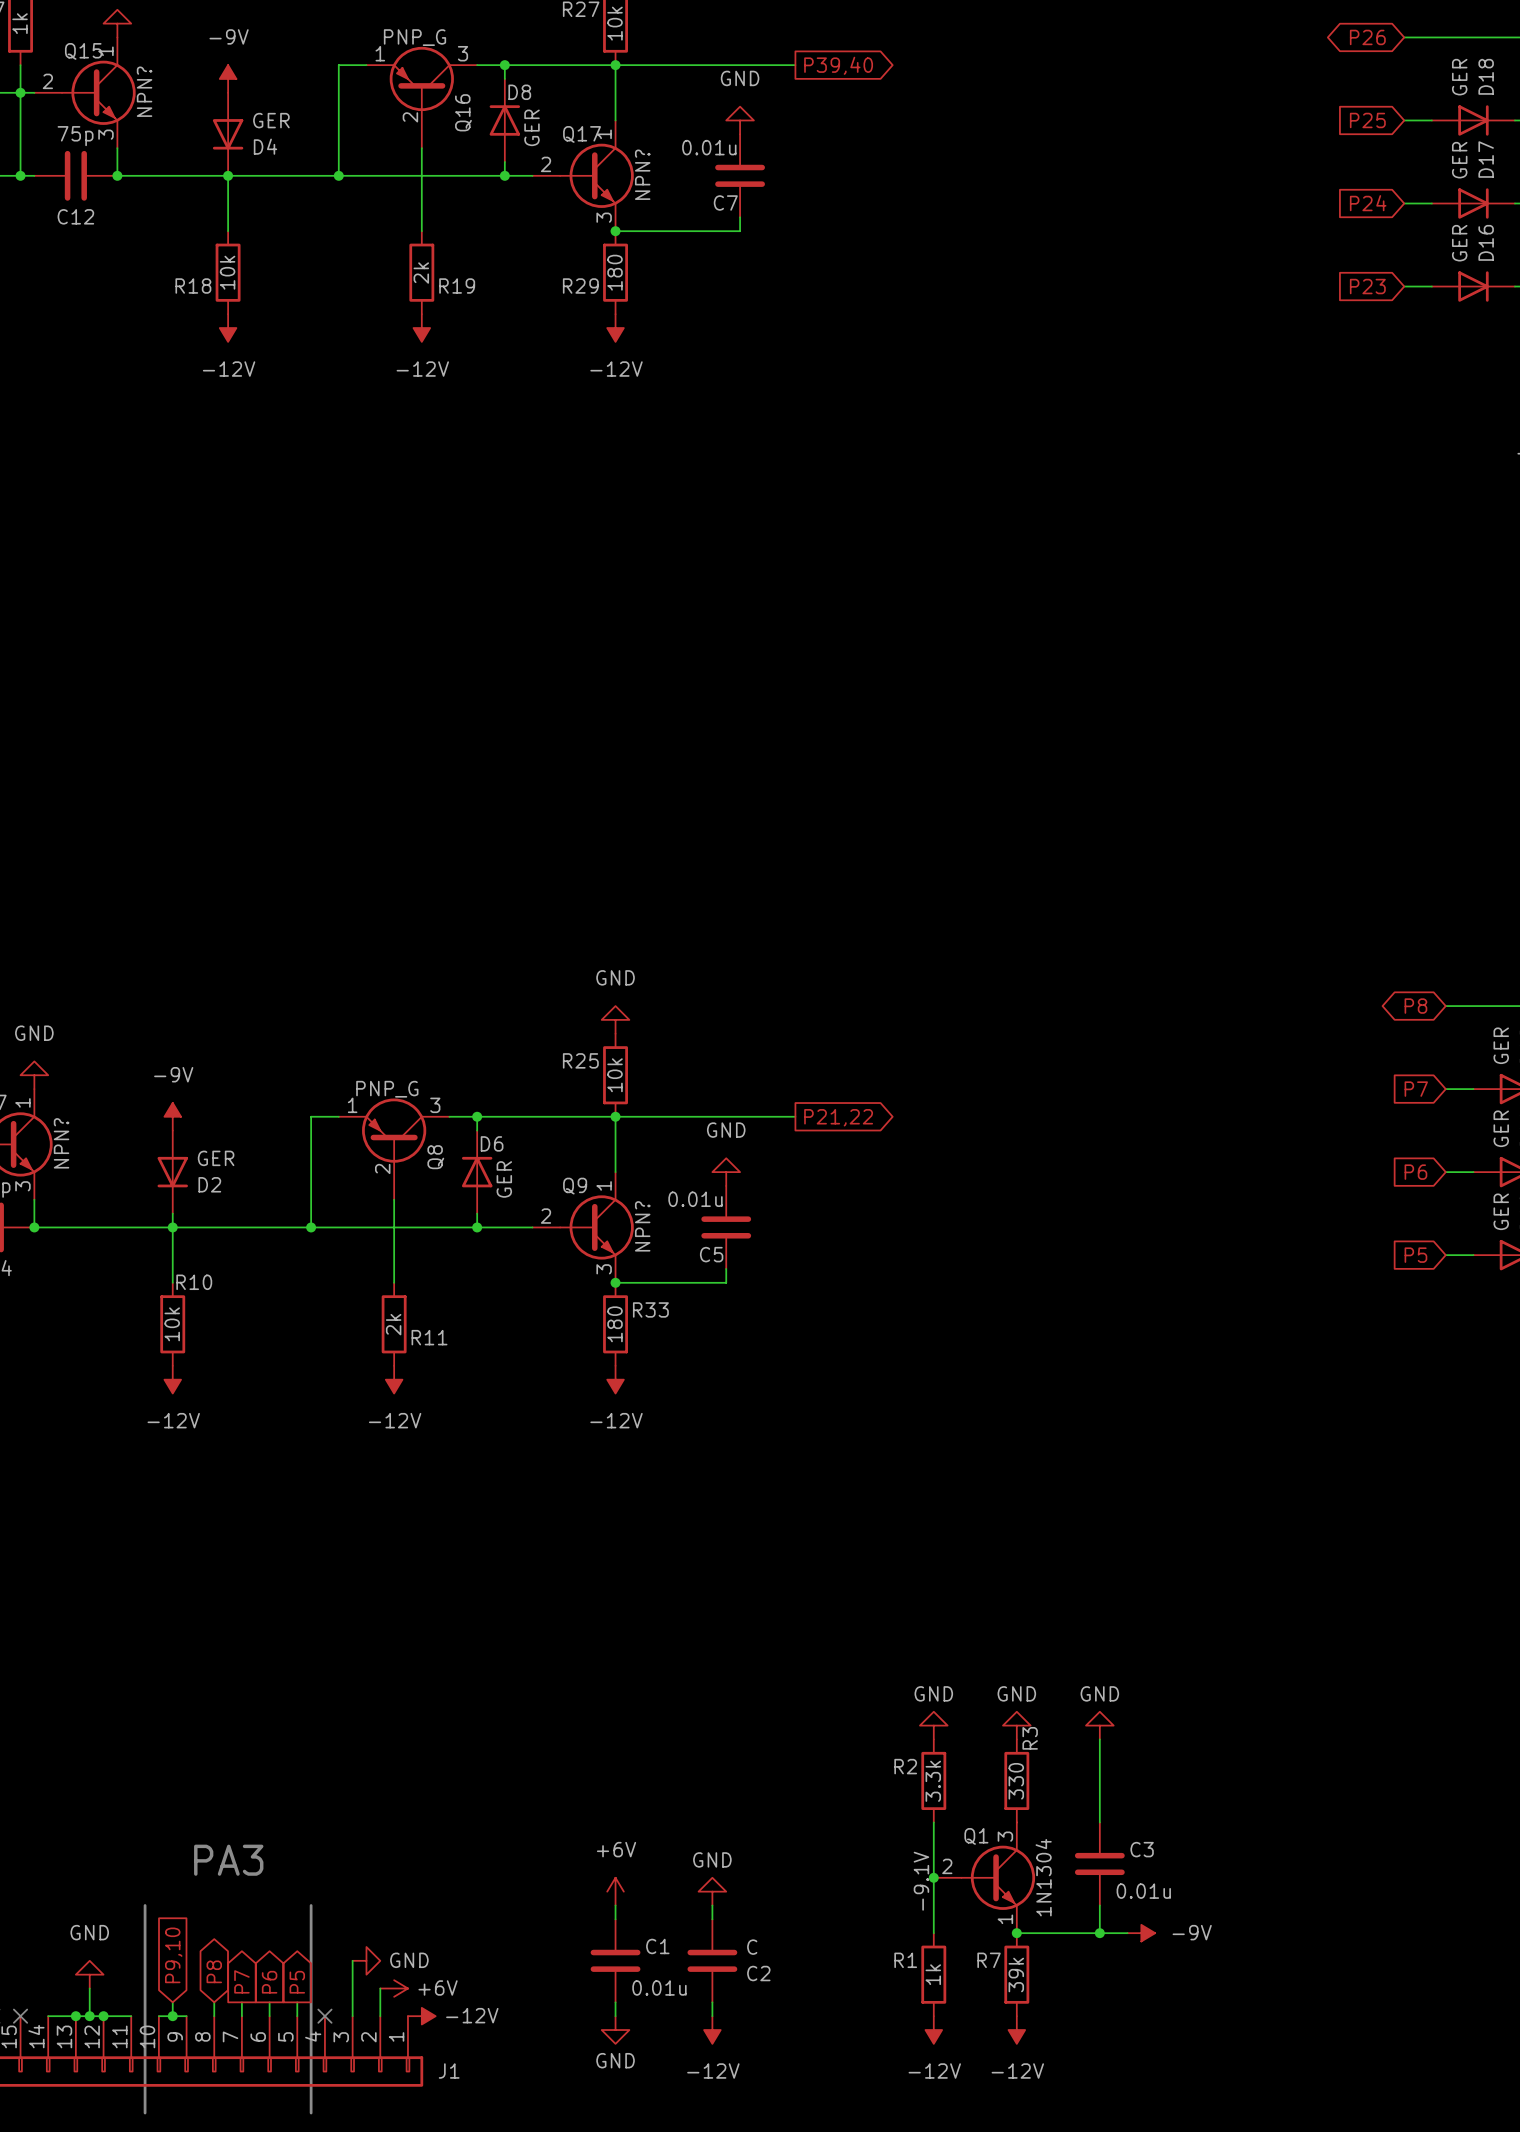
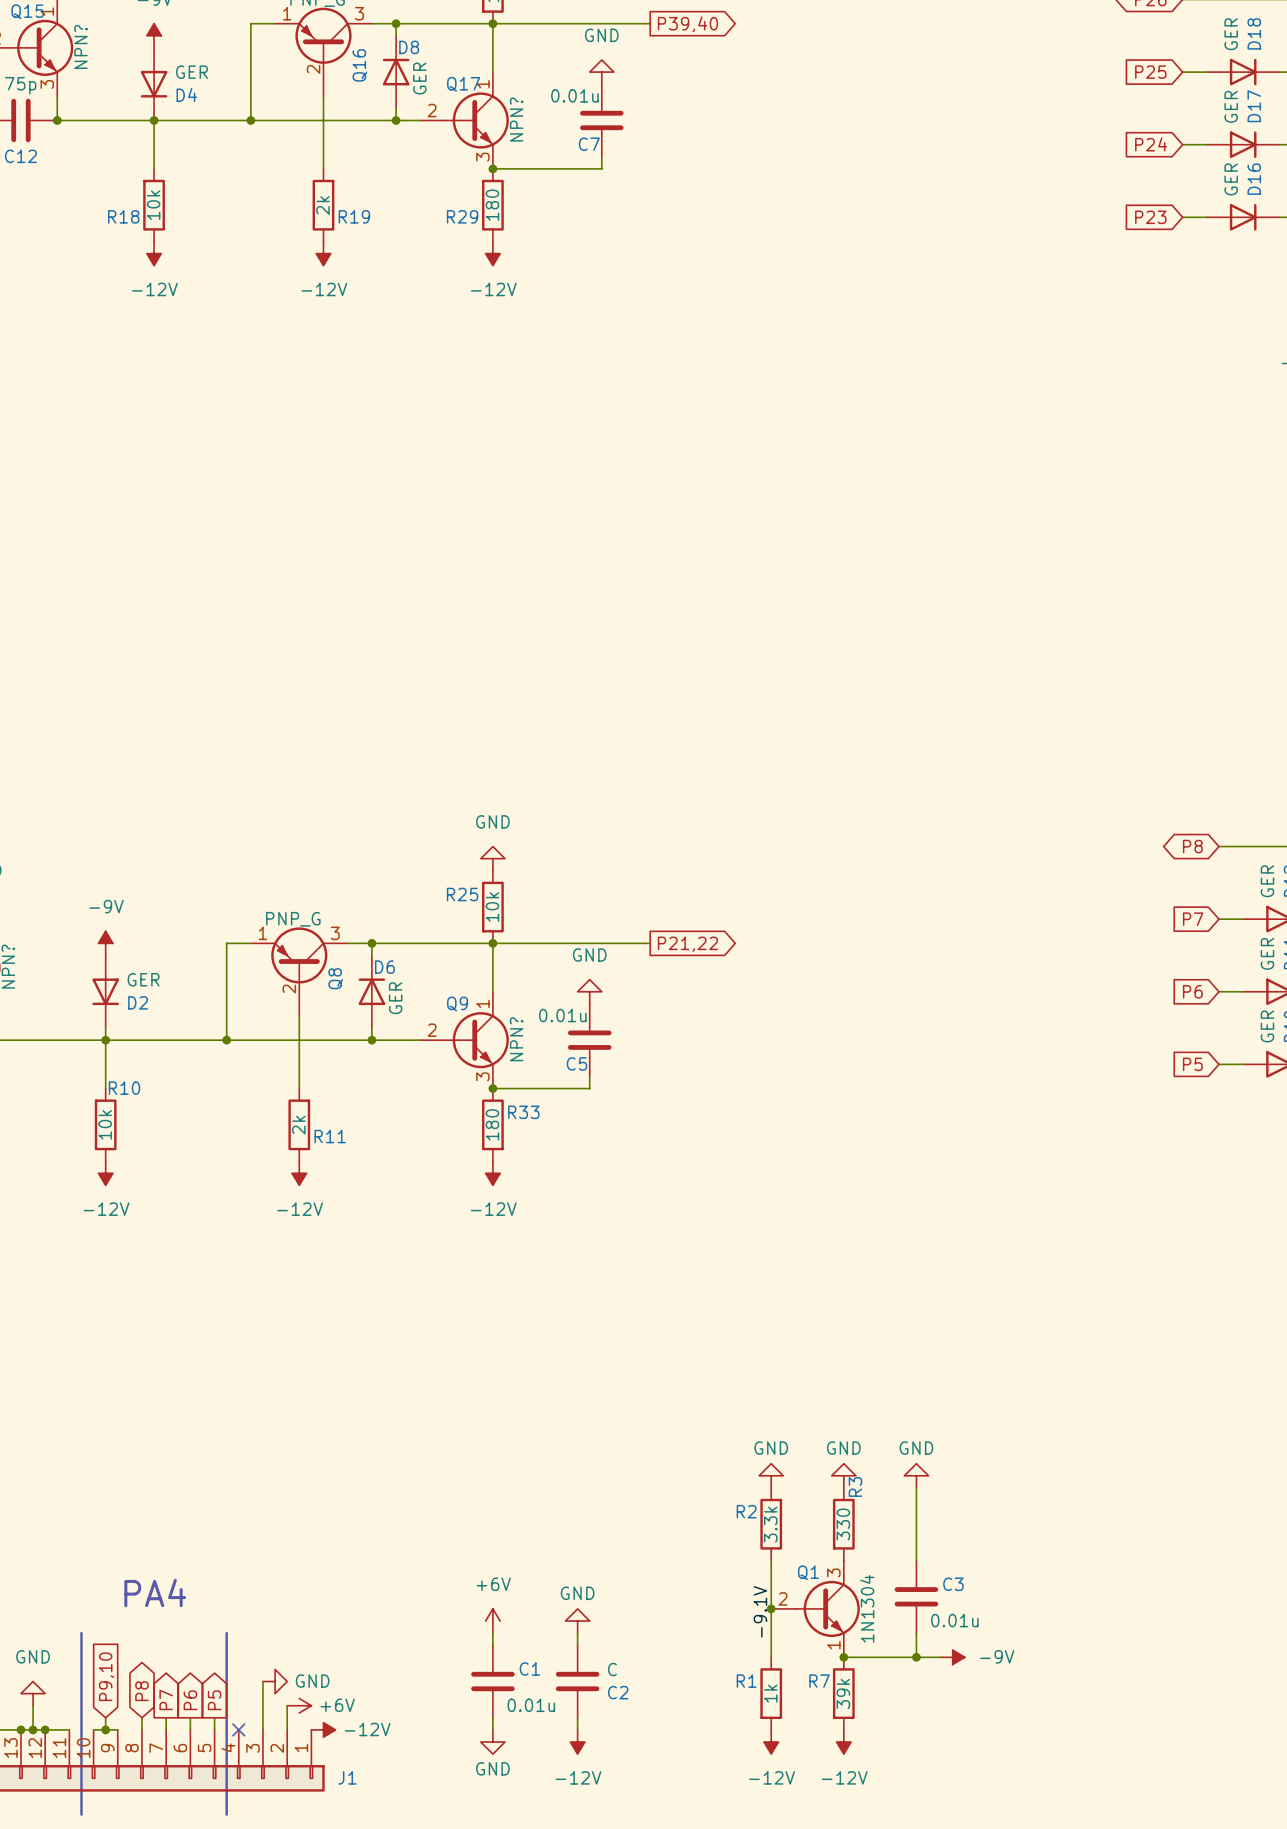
text: PA3 (228, 1860) -> PA4 (155, 1592)

